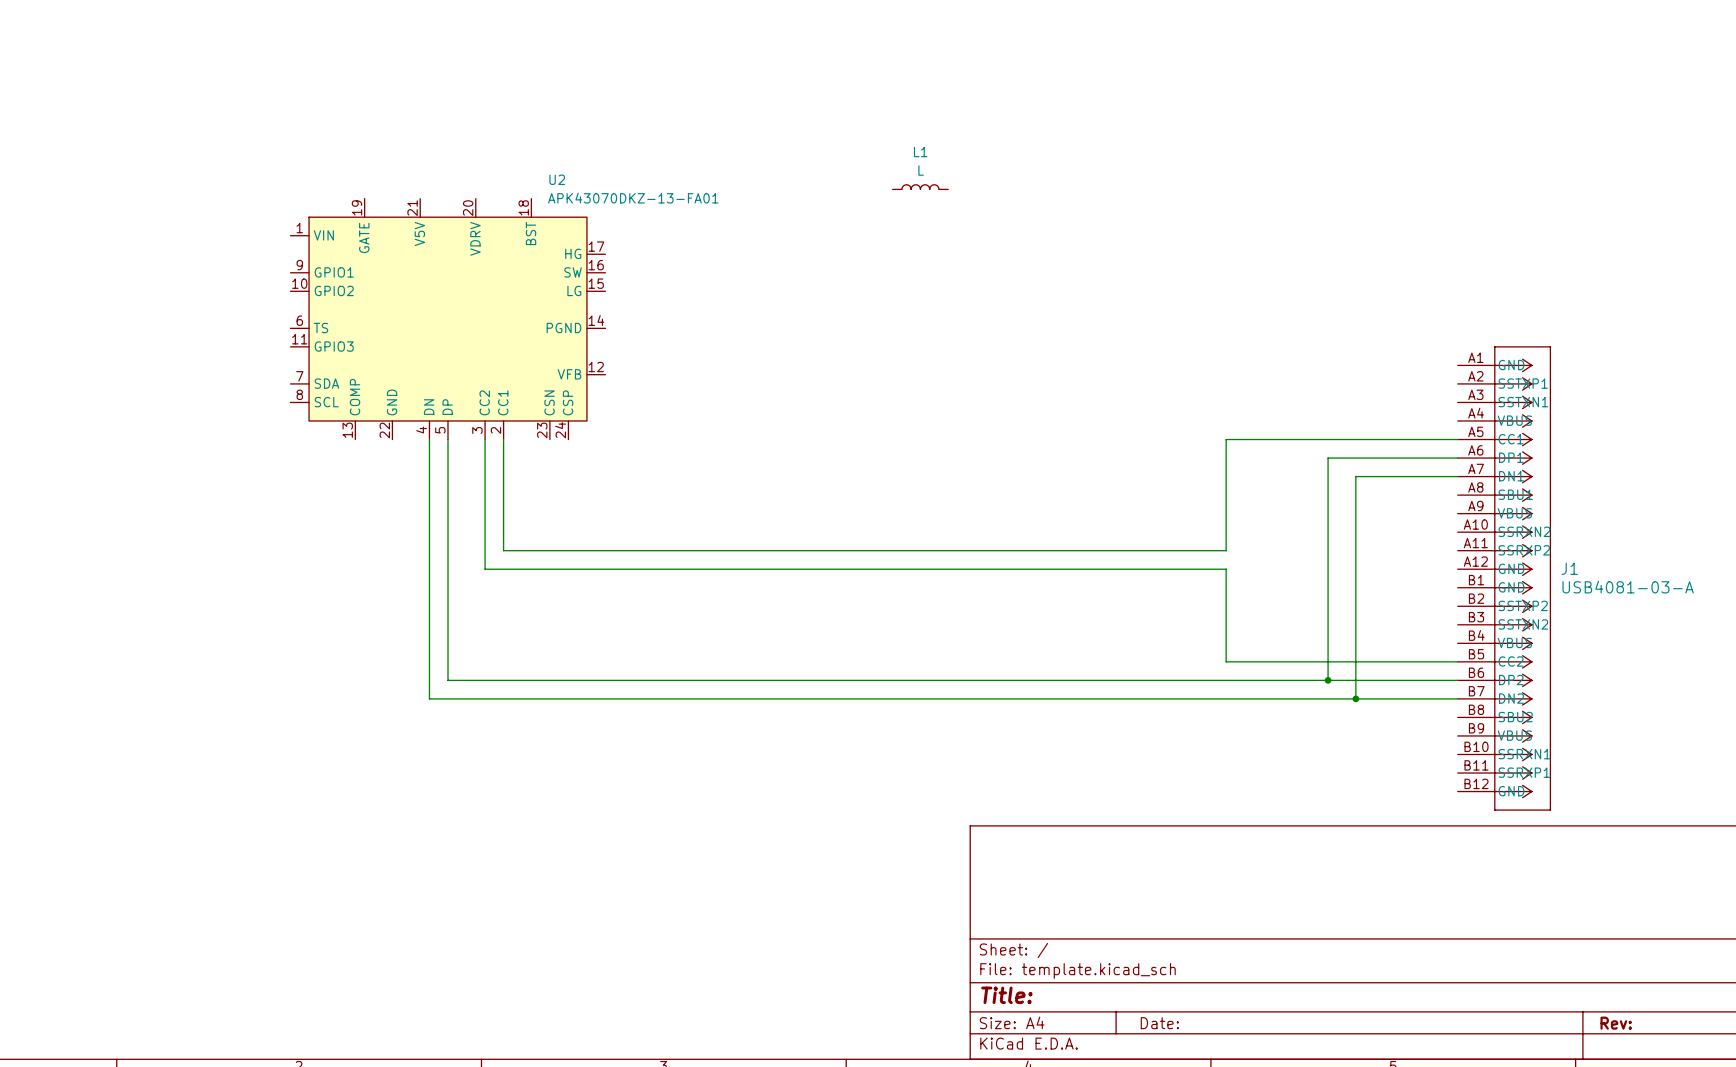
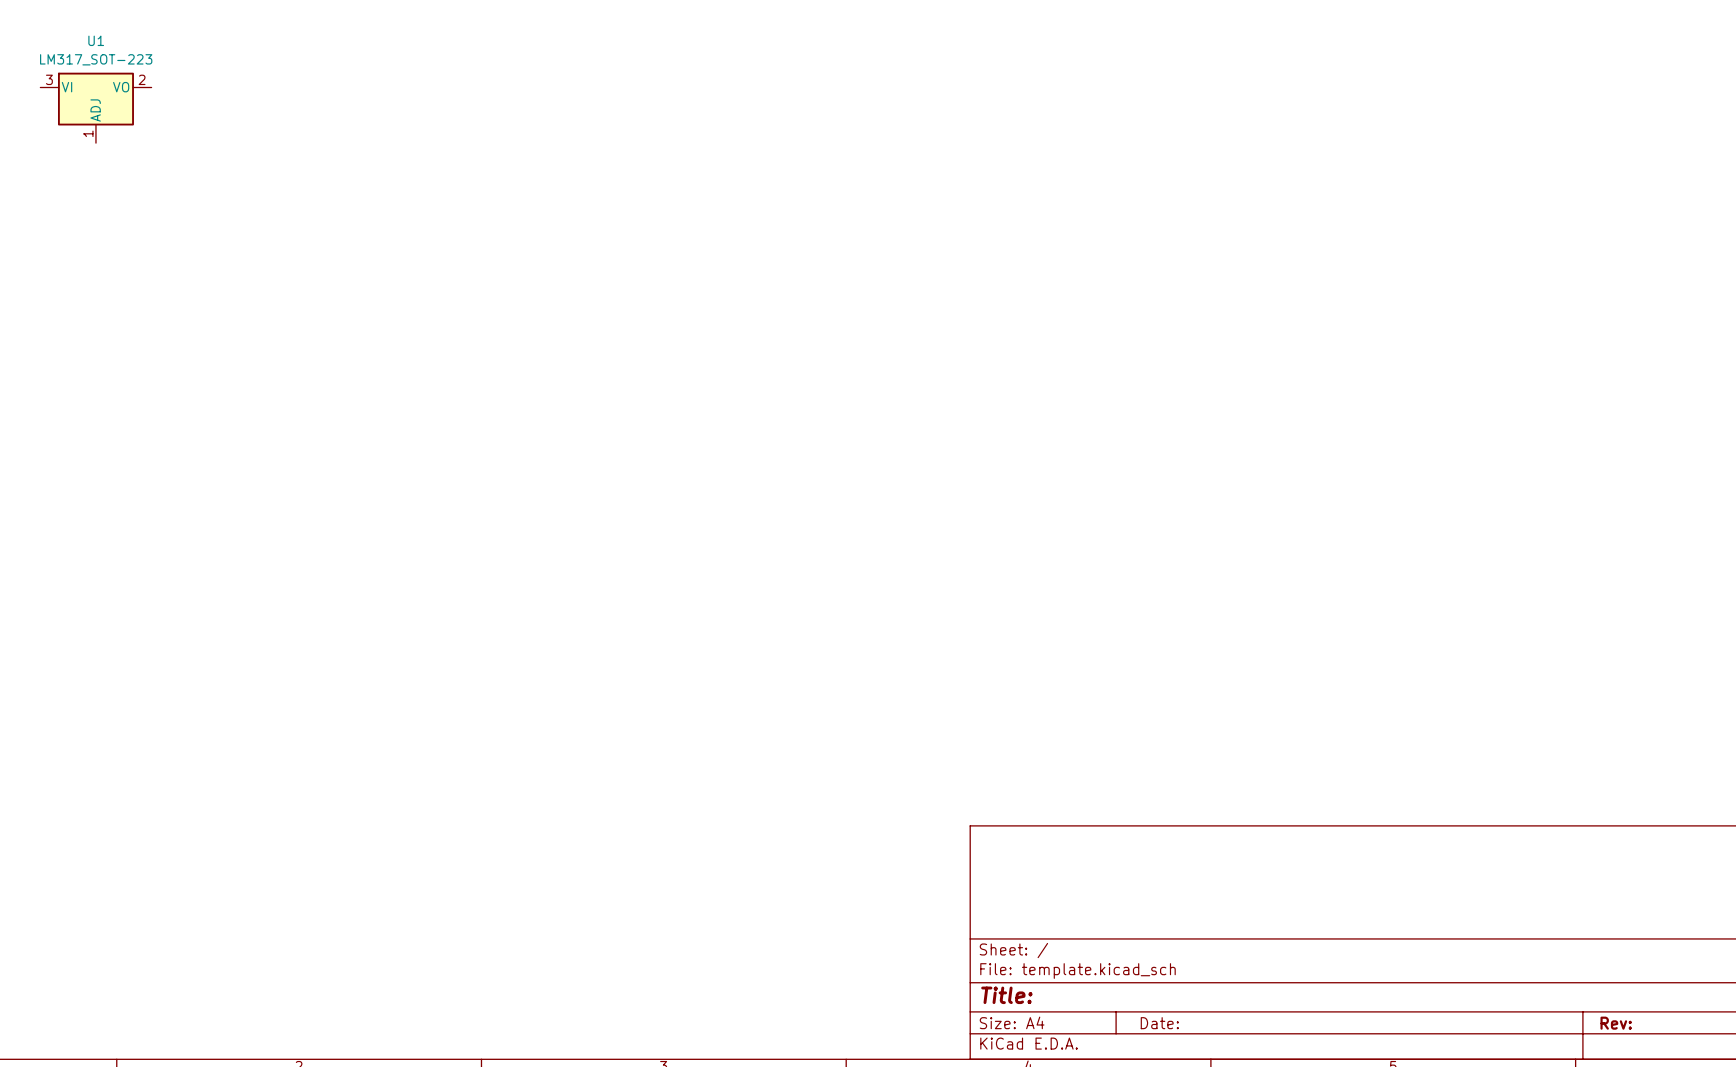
U1: none -> LM317_SOT-223 (95, 107)
L1: L (920, 187) -> none
U2: APK43070DKZ-13-FA01 (448, 319) -> none
wire: (429, 439) (429, 698) (1457, 698) -> none
wire: (448, 439) (448, 680) (1457, 680) -> none
wire: (485, 439) (485, 569) (1226, 569) (1226, 661) (1457, 661) -> none
wire: (503, 439) (503, 550) (1226, 550) (1226, 439) (1457, 439) -> none
wire: (1457, 458) (1328, 458) (1328, 680) -> none
wire: (1457, 476) (1355, 476) (1355, 698) -> none
J1: USB4081-03-A (1504, 578) -> none
junction: (1328, 680) -> none
junction: (1355, 698) -> none

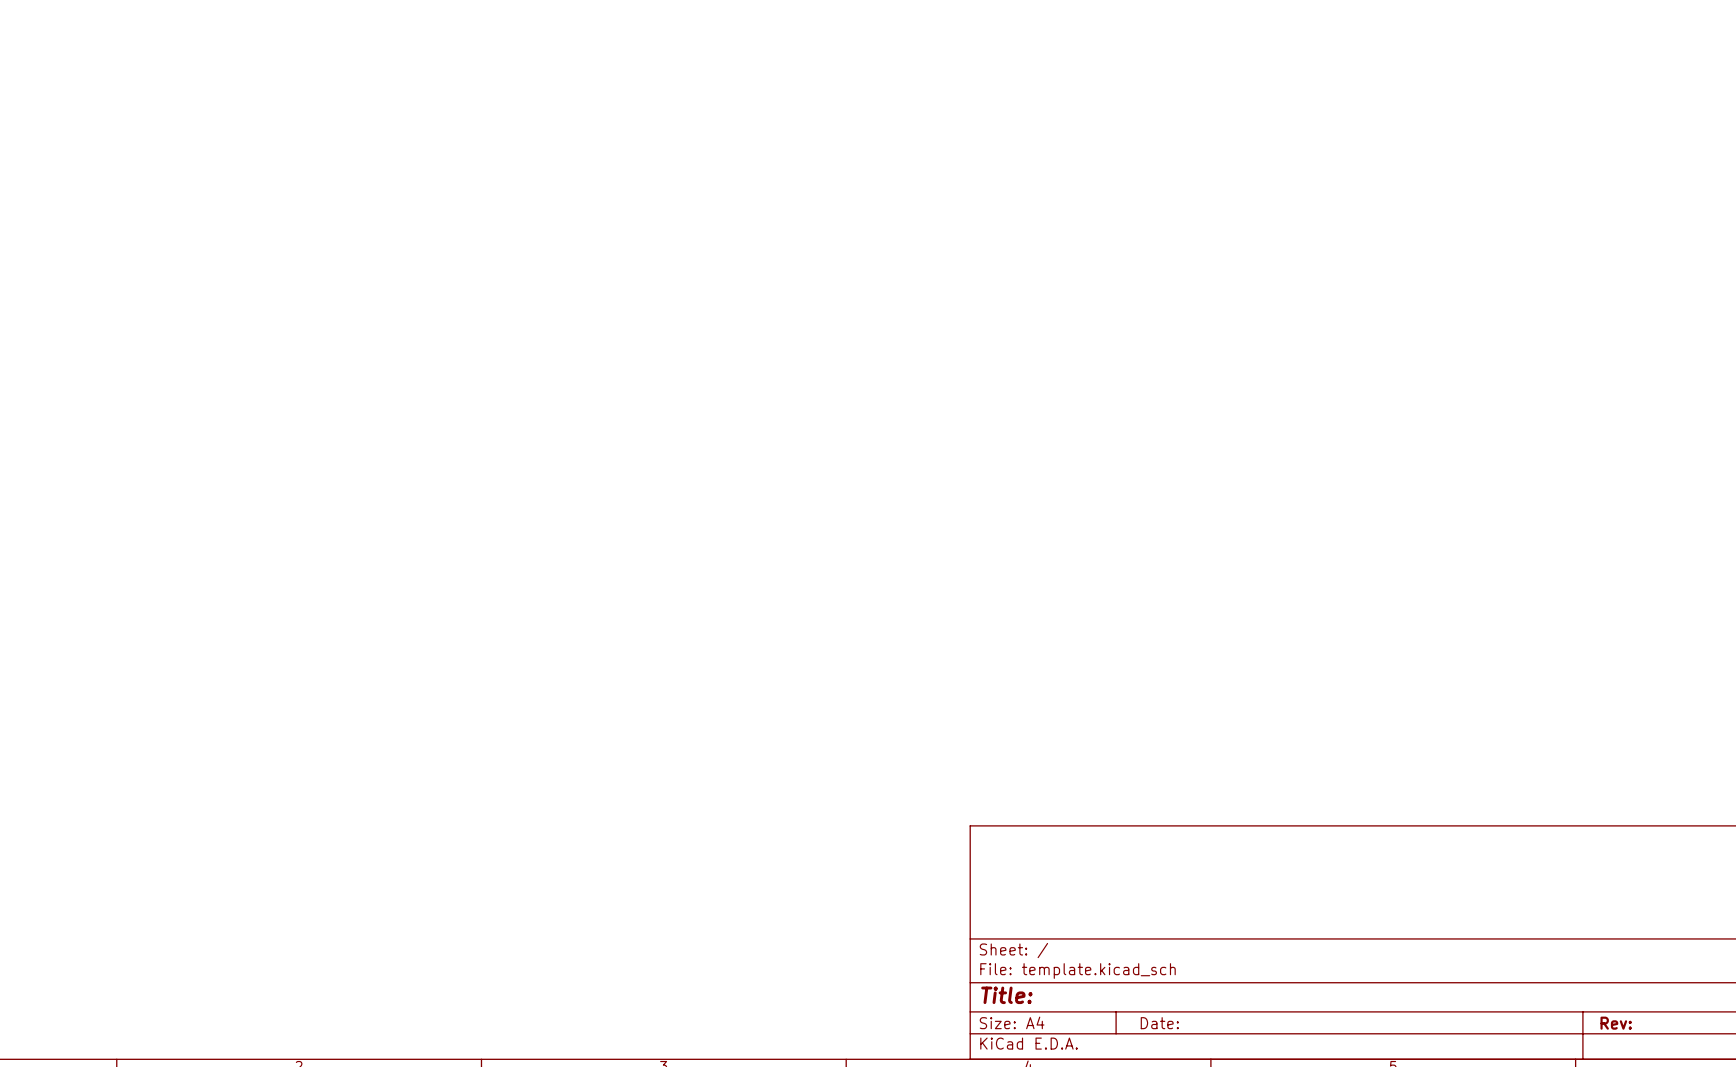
U1: LM317_SOT-223 (95, 107) -> none

